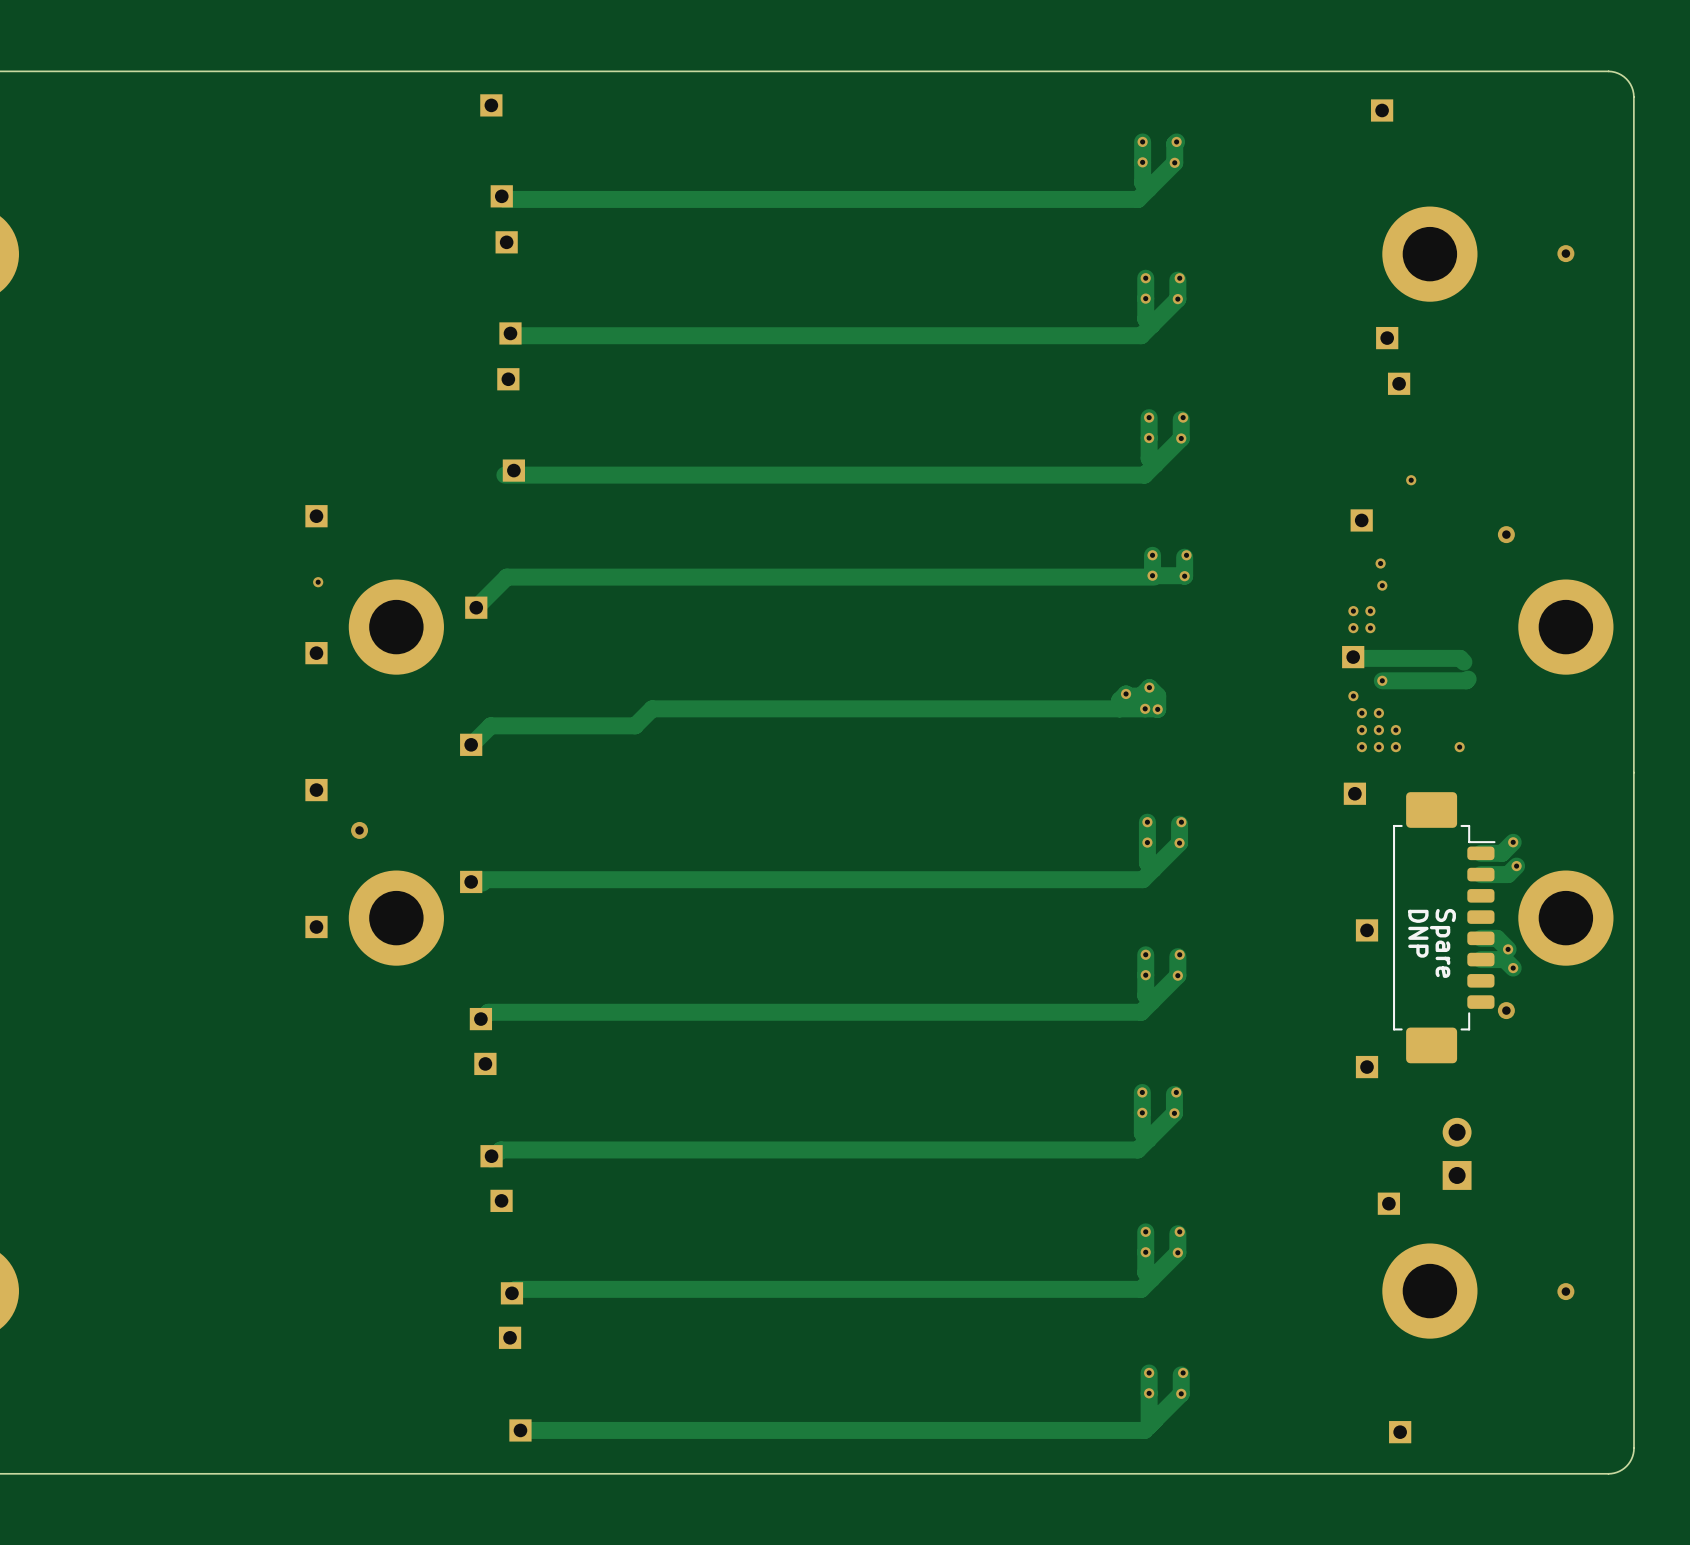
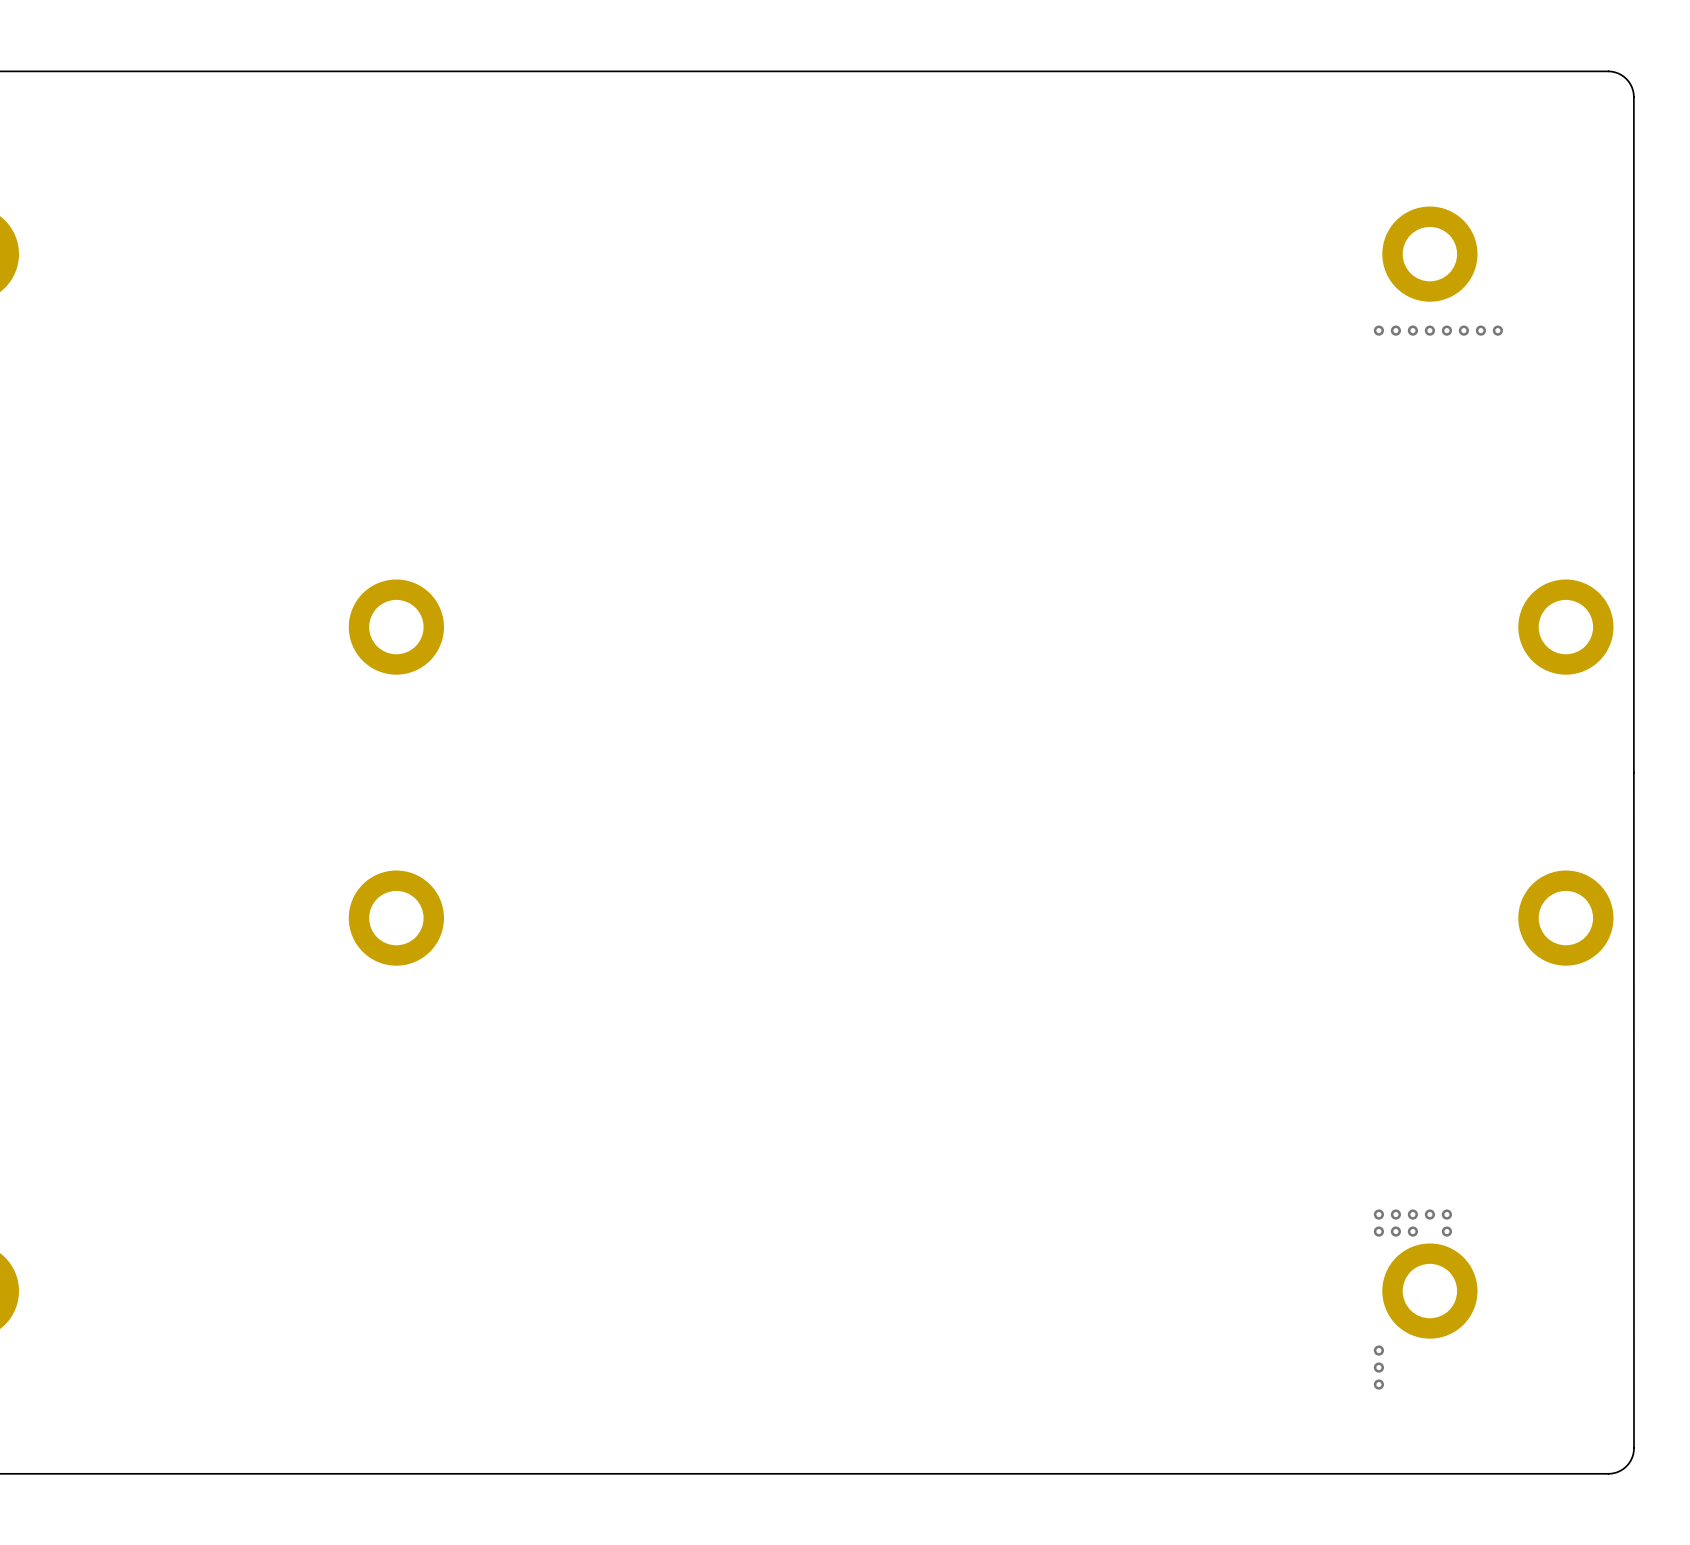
part: (491, 105) -> none
part: (1382, 110) -> none
track: (1142, 141) (1142, 182) (1148, 188) -> none
via: (1142, 141) -> none
track: (1176, 141) (1174, 143) (1174, 162) (1138, 199) (504, 199) (501, 196) -> none
via: (1176, 141) -> none
via: (1142, 162) -> none
via: (1174, 162) -> none
part: (501, 196) -> none
part: (506, 242) -> none
via: (1565, 253) -> none
track: (1145, 278) (1145, 319) (1151, 325) -> none
via: (1145, 278) -> none
via: (1179, 278) -> none
track: (1177, 280) (1177, 299) (1141, 335) (512, 335) (510, 333) -> none
via: (1145, 298) -> none
via: (1177, 299) -> none
via: none -> (1378, 330)
via: none -> (1395, 330)
via: none -> (1412, 330)
via: none -> (1429, 330)
via: none -> (1446, 330)
via: none -> (1463, 330)
via: none -> (1480, 330)
via: none -> (1497, 330)
part: (510, 333) -> none
part: (1387, 338) -> none
part: (508, 379) -> none
part: (1399, 383) -> none
track: (1149, 417) (1149, 458) (1155, 464) -> none
via: (1149, 417) -> none
via: (1183, 417) -> none
track: (1181, 419) (1181, 438) (1144, 475) (504, 475) -> none
via: (1149, 438) -> none
via: (1181, 438) -> none
part: (513, 470) -> none
via: (1411, 480) -> none
part: (316, 516) -> none
part: (1361, 520) -> none
via: (1506, 534) -> none
track: (1152, 555) (1152, 575) (1184, 576) (1184, 557) -> none
via: (1152, 555) -> none
via: (1186, 555) -> none
via: (1380, 563) -> none
via: (1152, 575) -> none
via: (1184, 576) -> none
track: (1153, 577) (506, 577) (476, 607) -> none
via: (318, 582) -> none
via: (1382, 585) -> none
part: (476, 607) -> none
via: (1353, 611) -> none
via: (1370, 611) -> none
via: (1353, 628) -> none
via: (1370, 628) -> none
part: (316, 653) -> none
part: (1353, 657) -> none
track: (1353, 658) (1460, 658) (1463, 662) -> none
track: (1468, 679) (1466, 680) (1382, 680) -> none
via: (1382, 680) -> none
via: (1149, 687) -> none
via: (1126, 693) -> none
via: (1353, 696) -> none
track: (1119, 708) (1119, 700) (1126, 693) (1128, 696) (1140, 696) (1149, 687) (1157, 695) (1157, 709) (652, 708) (635, 725) (490, 725) (471, 745) -> none
via: (1145, 708) -> none
via: (1157, 709) -> none
via: (1361, 713) -> none
via: (1378, 713) -> none
via: (1361, 730) -> none
via: (1378, 730) -> none
via: (1395, 730) -> none
part: (471, 744) -> none
via: (1361, 747) -> none
via: (1378, 747) -> none
via: (1395, 747) -> none
via: (1459, 747) -> none
part: (316, 790) -> none
part: (1354, 793) -> none
track: (1147, 822) (1147, 862) (1153, 869) -> none
via: (1147, 822) -> none
via: (1181, 822) -> none
track: (1179, 824) (1179, 843) (1142, 879) (474, 879) (471, 883) (482, 883) -> none
via: (359, 830) -> none
via: (1147, 842) -> none
track: (1513, 842) (1502, 853) (1480, 853) -> none
via: (1513, 842) -> none
via: (1179, 843) -> none
track: (1516, 866) (1508, 874) (1480, 874) -> none
via: (1516, 866) -> none
part: (471, 881) -> none
part: (316, 927) -> none
part: (1444, 927) -> none
part: (1367, 930) -> none
text: DNP (1418, 933) -> none
track: (1480, 938) (1497, 938) (1508, 949) -> none
text: Spare (1442, 943) -> none
via: (1508, 949) -> none
track: (1145, 954) (1145, 995) (1151, 1001) -> none
via: (1145, 954) -> none
via: (1179, 954) -> none
track: (1177, 956) (1177, 975) (1141, 1012) (488, 1012) (480, 1019) -> none
track: (1480, 959) (1504, 959) (1513, 968) -> none
via: (1513, 968) -> none
via: (1145, 975) -> none
via: (1177, 975) -> none
via: (1506, 1010) -> none
part: (480, 1019) -> none
part: (485, 1063) -> none
part: (1367, 1067) -> none
track: (1142, 1092) (1142, 1133) (1148, 1139) -> none
via: (1142, 1092) -> none
via: (1176, 1092) -> none
track: (1174, 1094) (1174, 1113) (1137, 1149) (500, 1149) (491, 1159) -> none
via: (1142, 1112) -> none
via: (1174, 1113) -> none
part: (1457, 1153) -> none
part: (491, 1156) -> none
part: (501, 1200) -> none
part: (1388, 1203) -> none
via: none -> (1378, 1214)
via: none -> (1395, 1214)
via: none -> (1412, 1214)
via: none -> (1429, 1214)
via: none -> (1446, 1214)
track: (1145, 1231) (1145, 1272) (1151, 1278) -> none
via: (1145, 1231) -> none
via: (1179, 1231) -> none
via: none -> (1378, 1231)
via: none -> (1395, 1231)
via: none -> (1412, 1231)
via: none -> (1446, 1231)
track: (1177, 1233) (1177, 1252) (1141, 1289) (515, 1289) (511, 1293) -> none
via: (1145, 1252) -> none
via: (1177, 1252) -> none
via: (1565, 1291) -> none
part: (511, 1293) -> none
part: (510, 1337) -> none
via: none -> (1378, 1350)
via: none -> (1378, 1367)
track: (1149, 1372) (1149, 1425) -> none
via: (1149, 1372) -> none
via: (1183, 1372) -> none
track: (1181, 1374) (1181, 1393) (1144, 1430) (520, 1430) (525, 1428) -> none
via: none -> (1378, 1384)
via: (1149, 1393) -> none
via: (1181, 1393) -> none
part: (520, 1430) -> none
part: (1400, 1432) -> none

